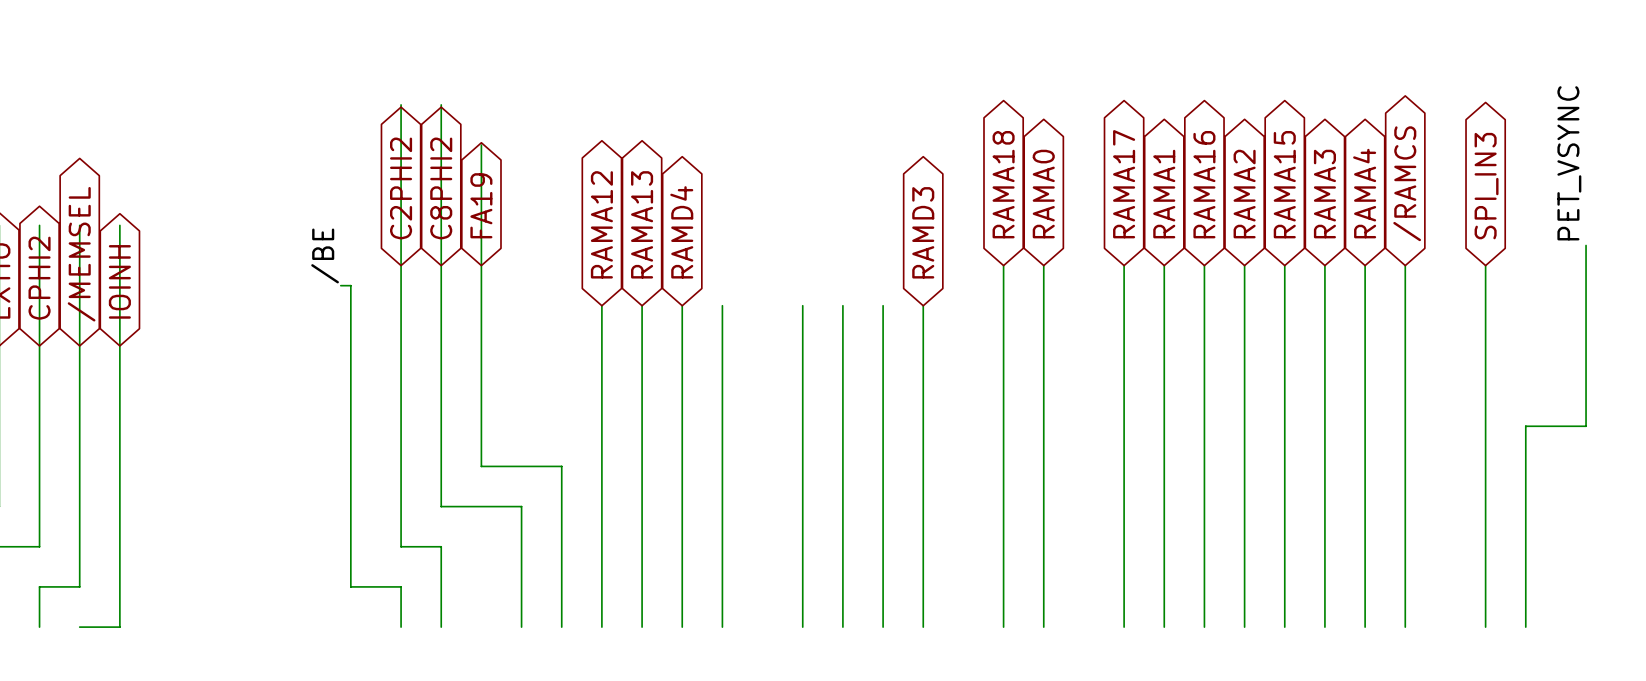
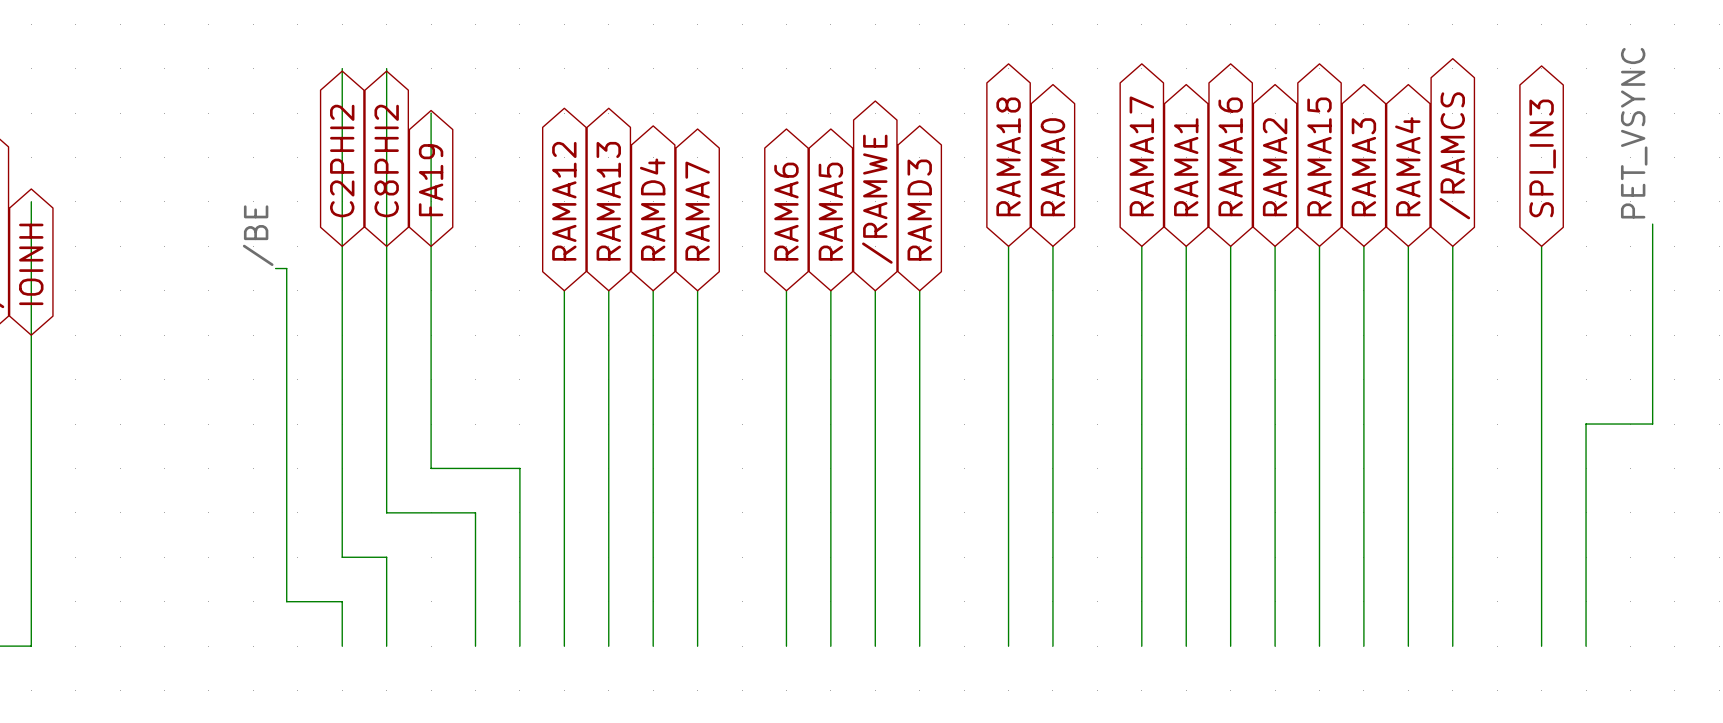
global label: none -> /RAMWE (877, 199)
global label: none -> RAMA7 (697, 211)
global label: none -> RAMA6 (786, 211)
global label: none -> RAMA5 (830, 211)

